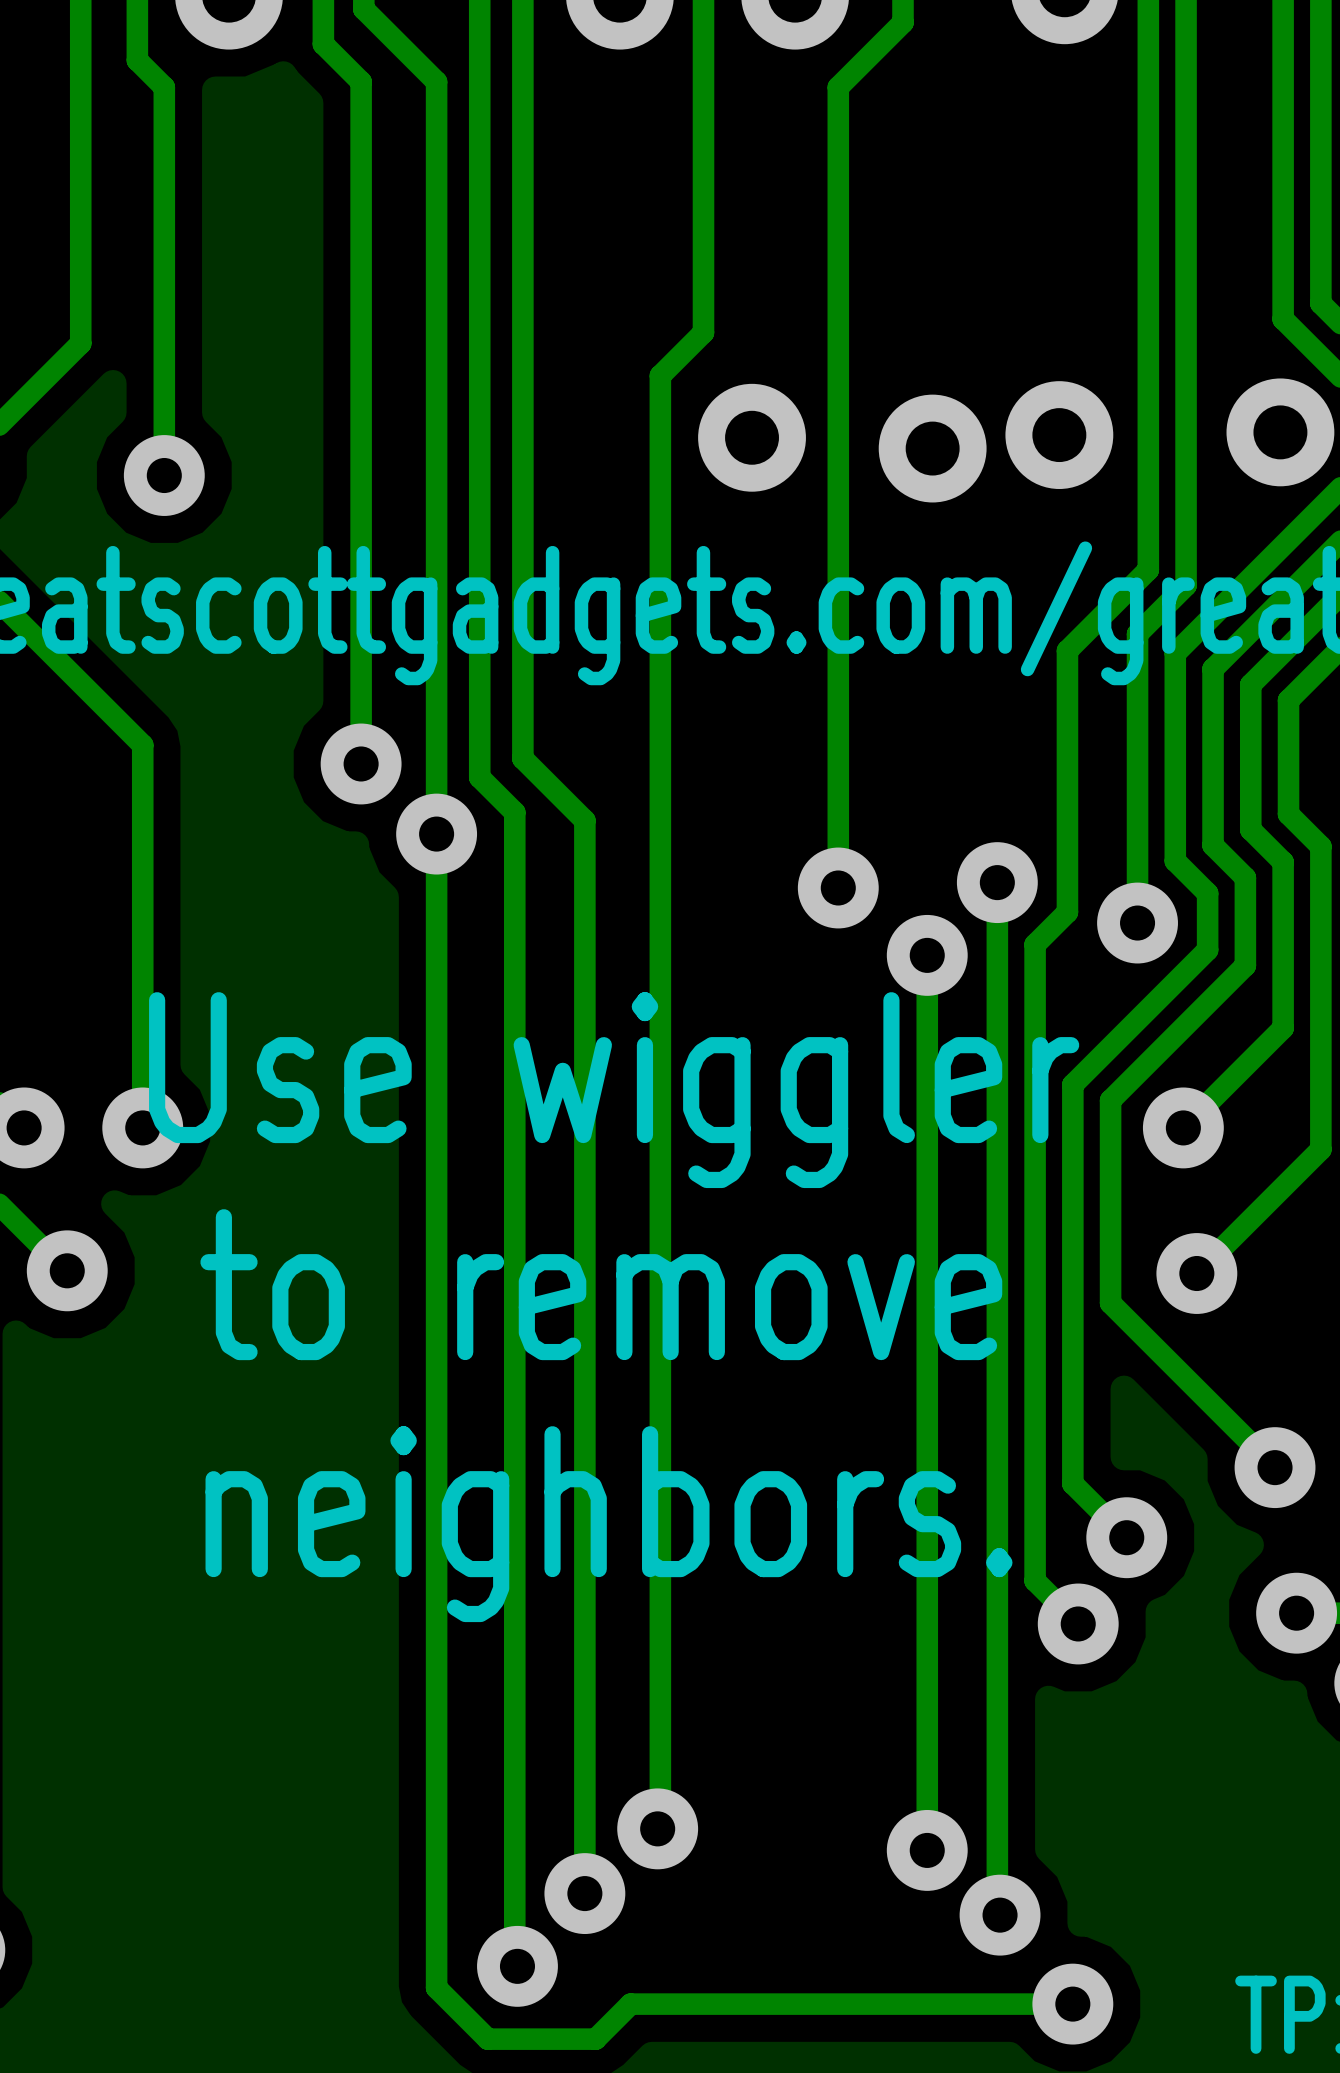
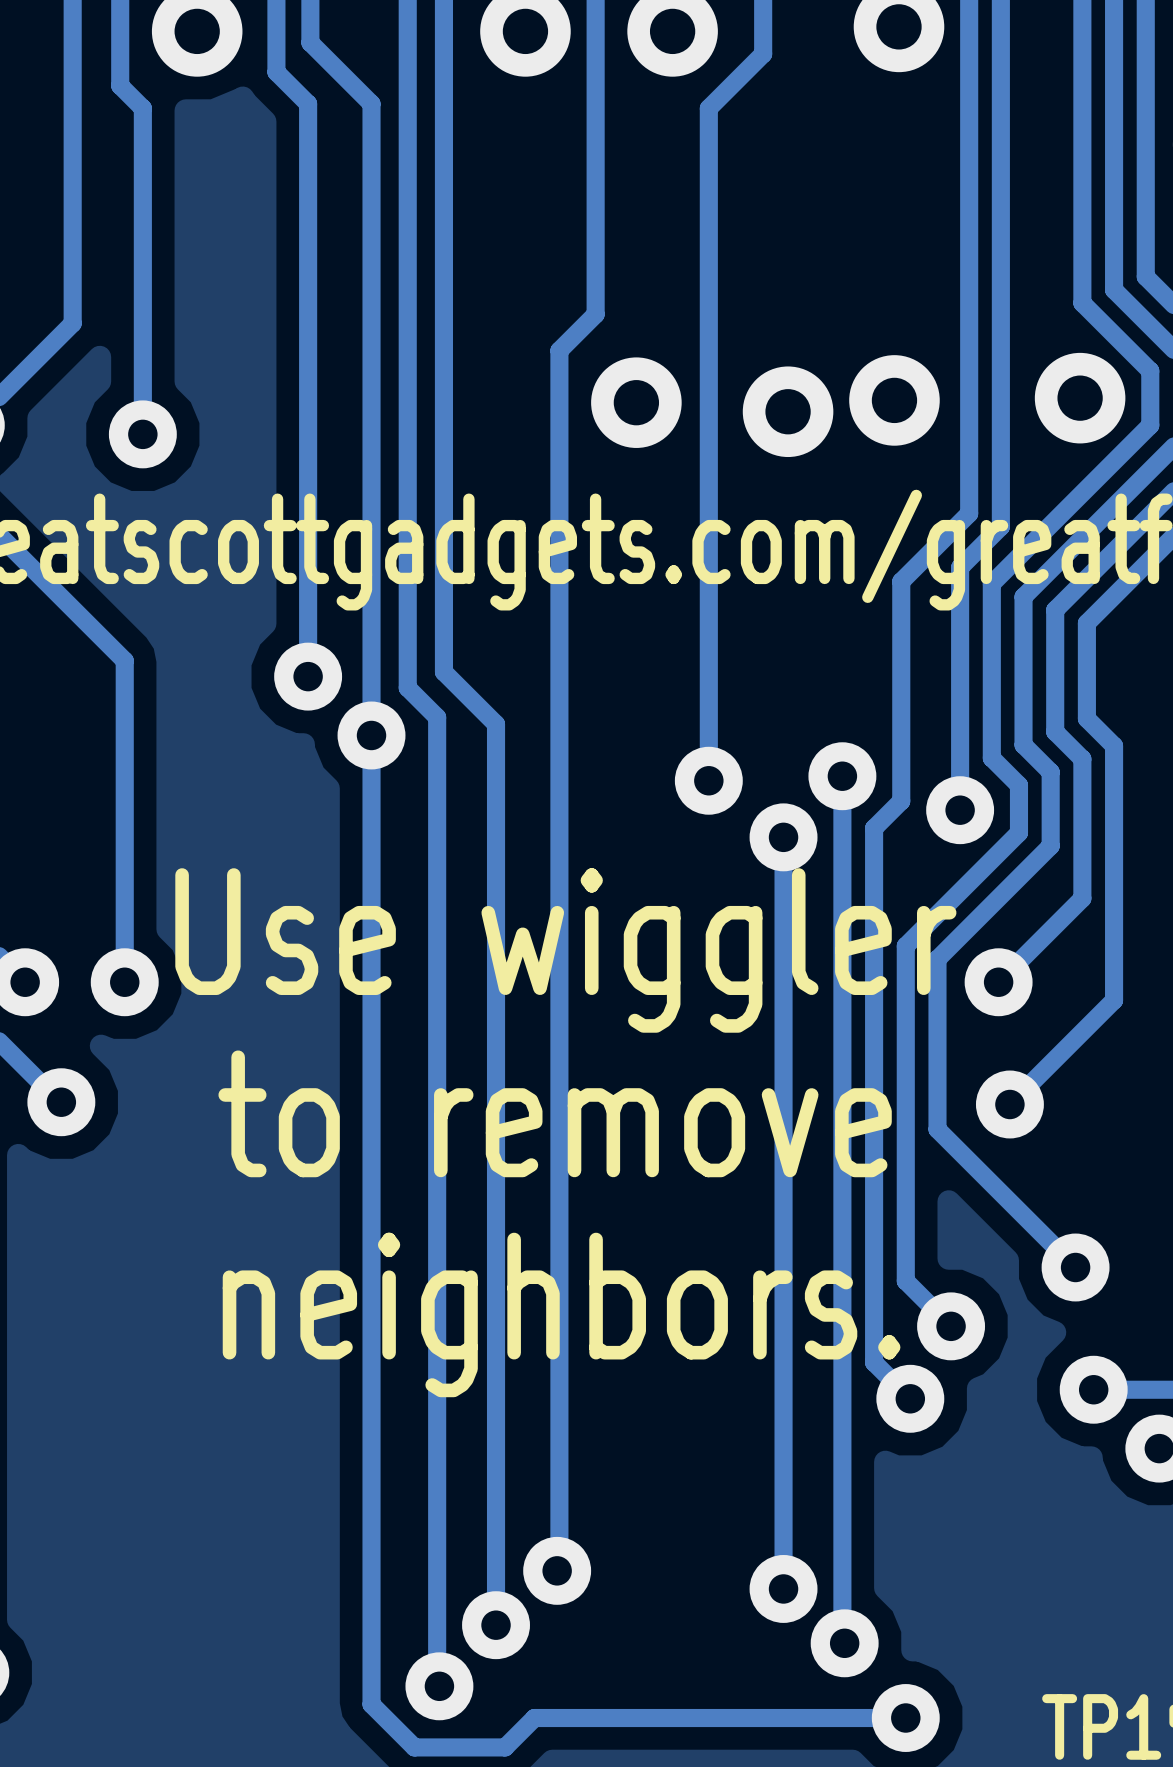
text position: Use wiggler (614, 1090) -> Use wiggler (565, 950)
text position: to remove (601, 1284) -> to remove (555, 1113)
text position: neighbors. (609, 1524) -> neighbors. (561, 1314)

